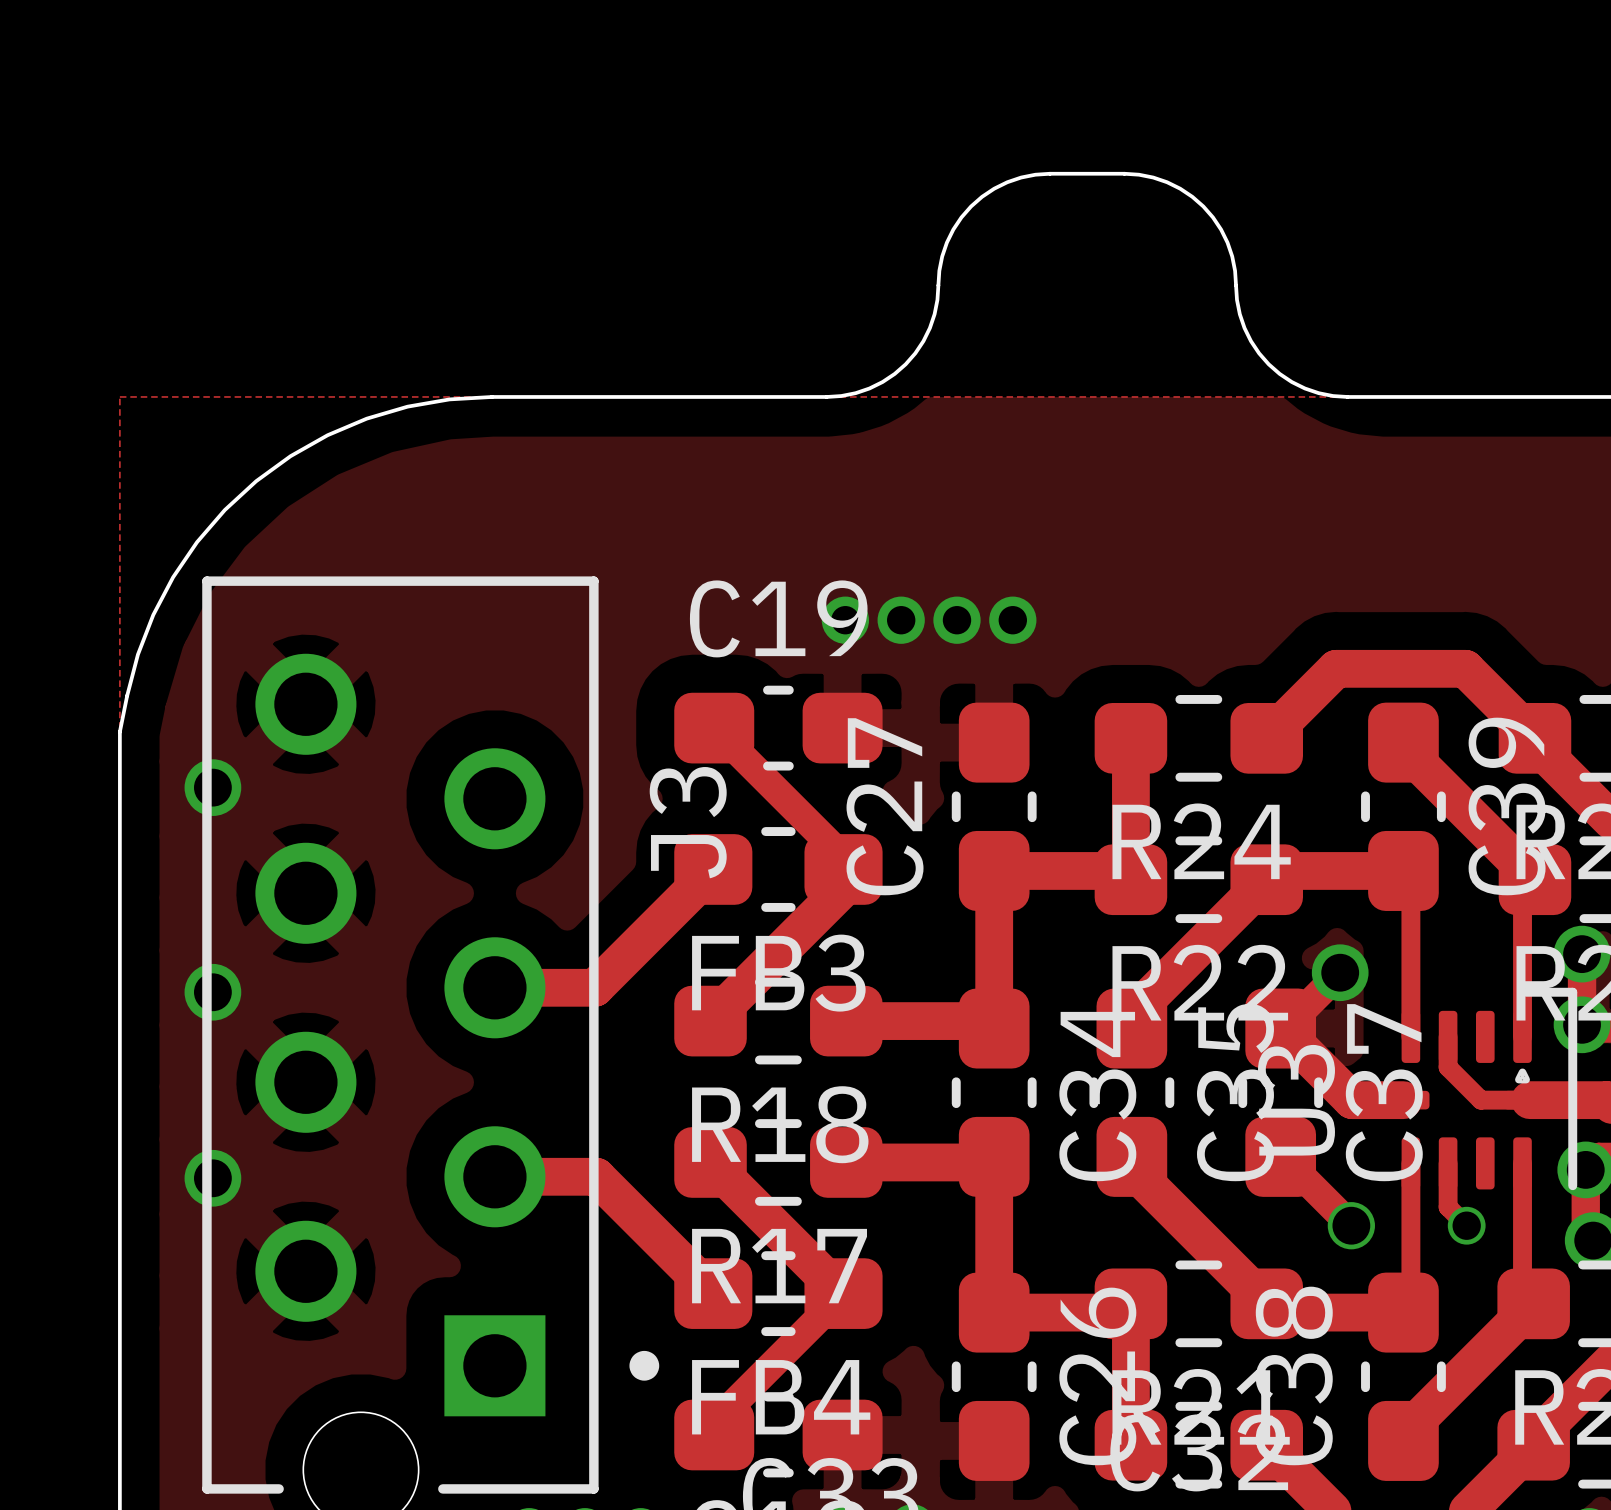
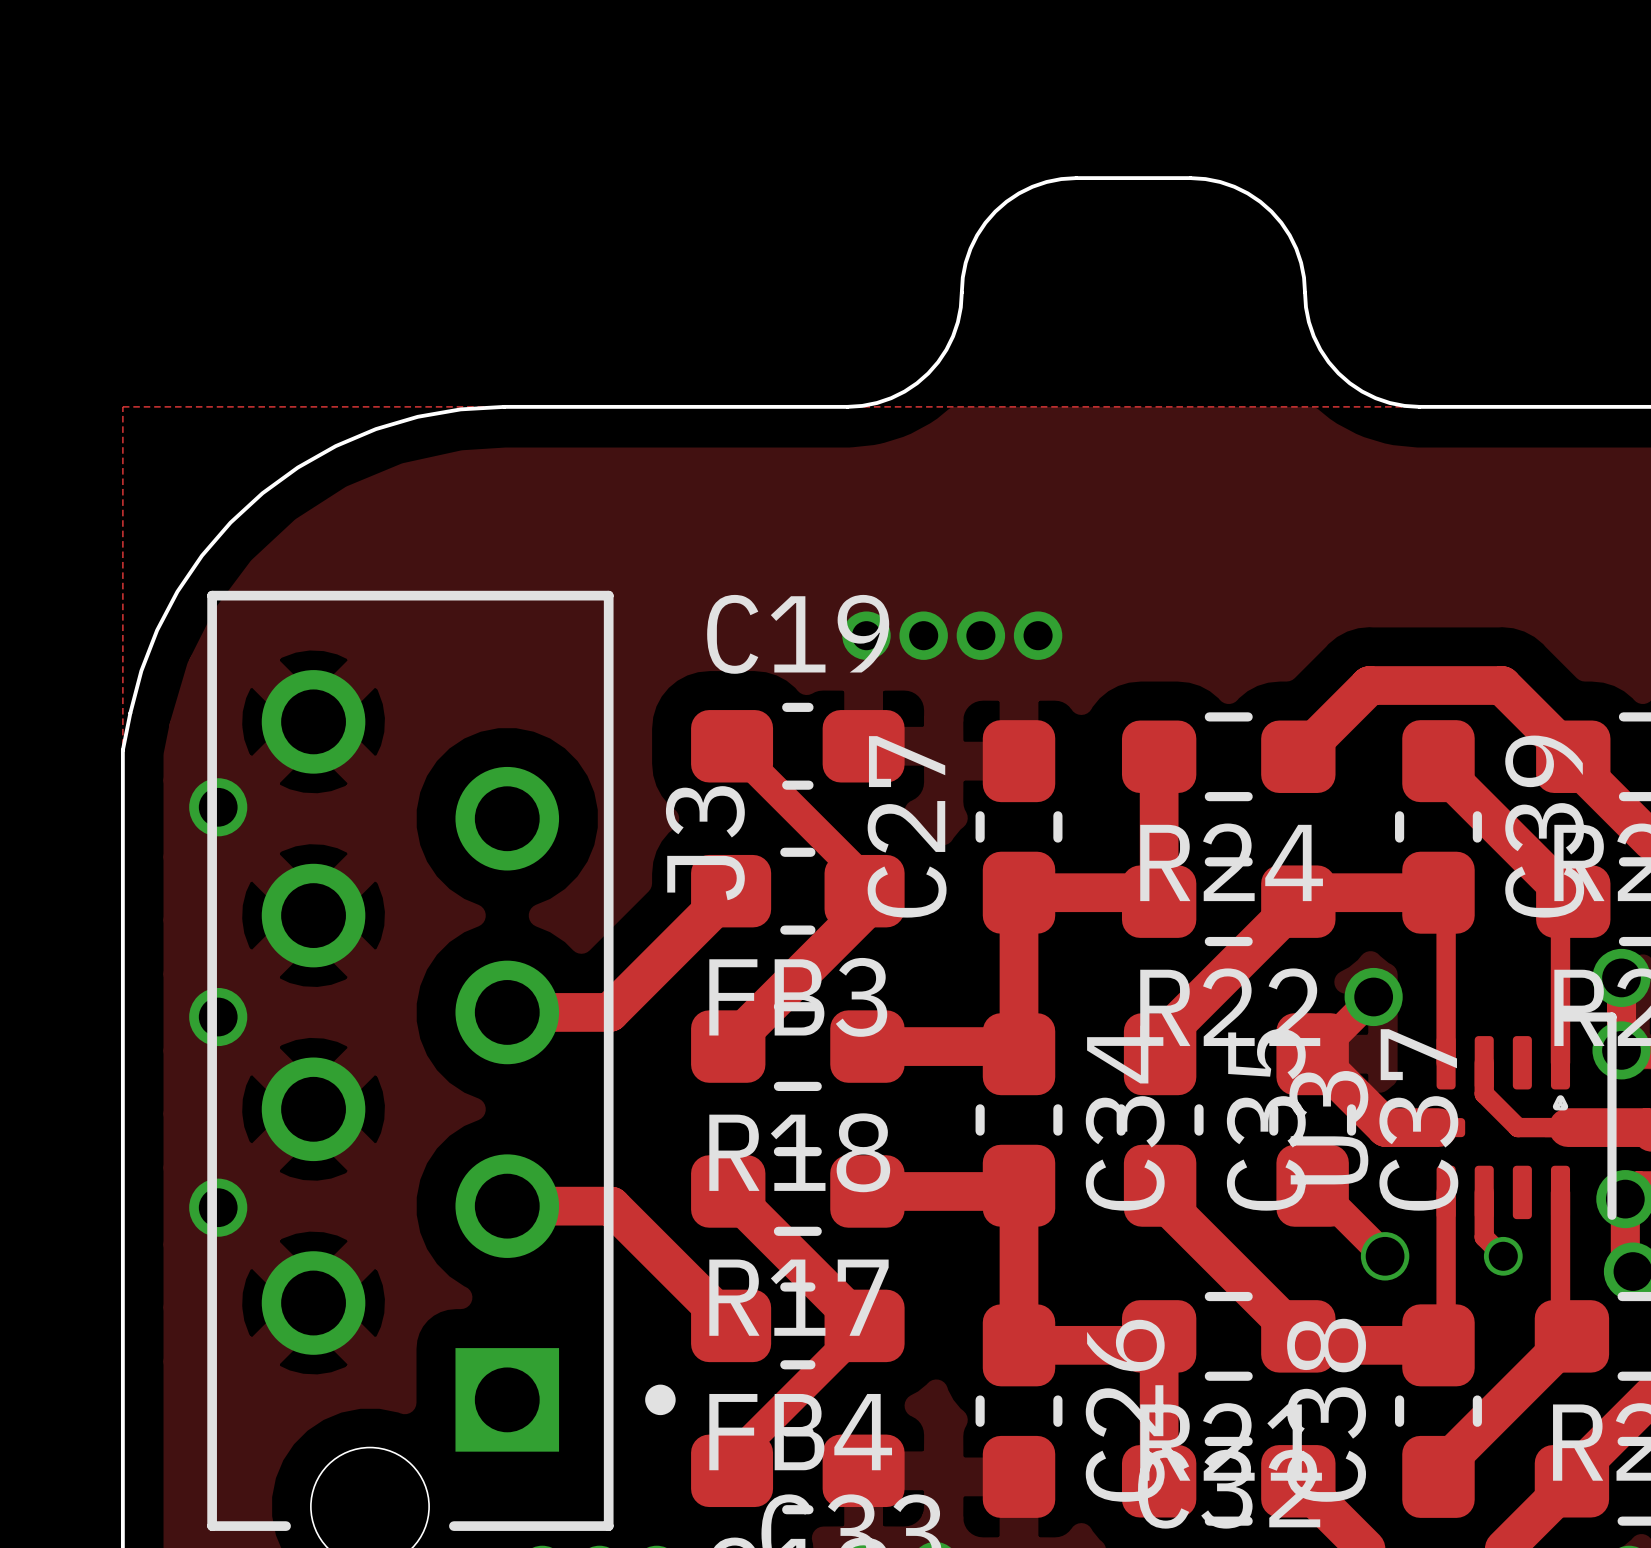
board edge: (1124, 173) (1153, 177) (1180, 188) (1192, 196) (1212, 217) (1227, 242) (1232, 256) (1236, 299) (1244, 328) (1259, 353) (1279, 373) (1304, 388) (1318, 393) (1347, 396) (1384, 396) -> (1152, 178) (1190, 178) (1220, 181) (1247, 193) (1260, 201) (1281, 222) (1296, 248) (1304, 277) (1308, 322) (1313, 336) (1328, 362) (1349, 383) (1375, 398) (1404, 405) (1419, 406)

